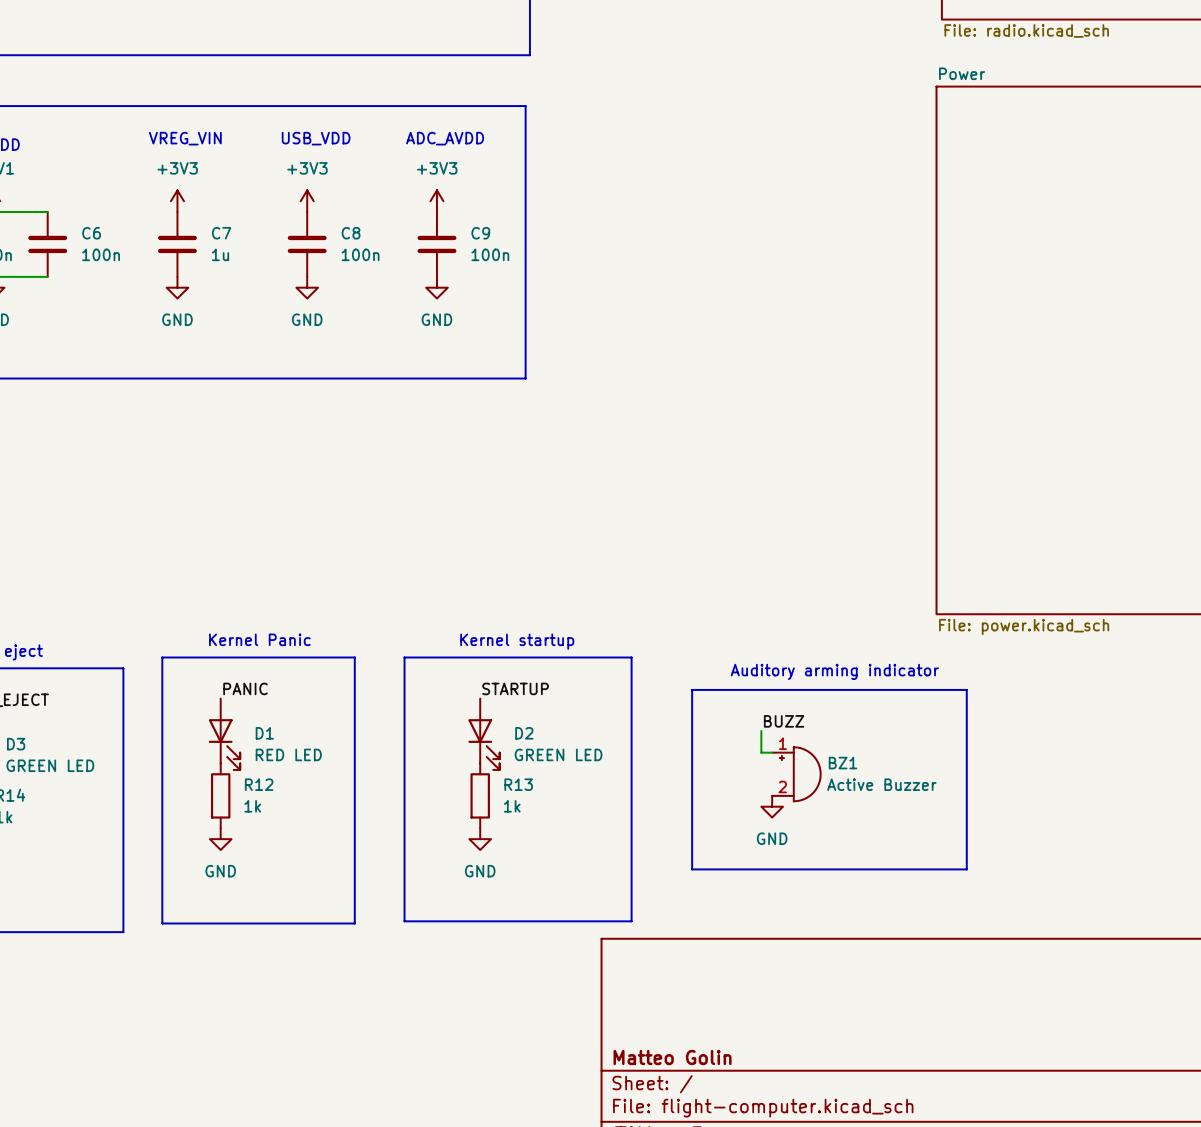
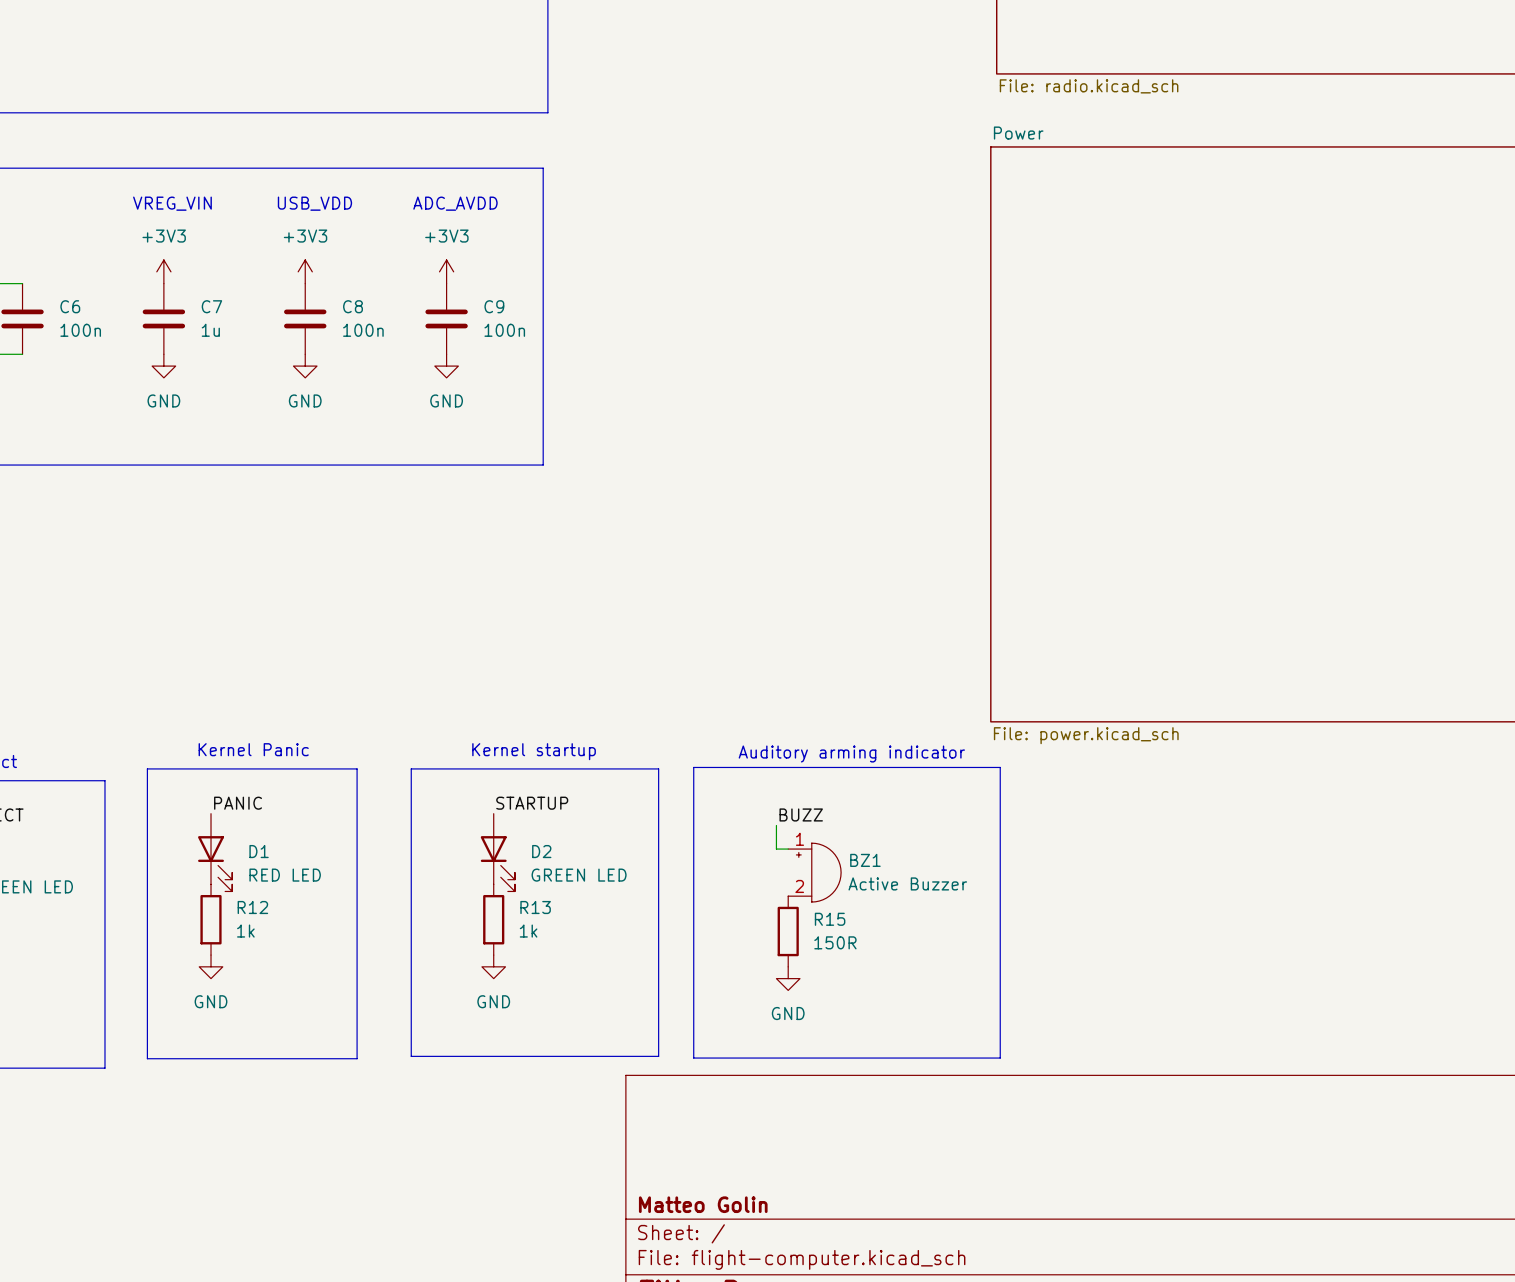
text position: Auditory arming indicator (834, 671) -> Auditory arming indicator (851, 754)
line: (692, 689) (966, 689) (966, 869) (692, 869) (692, 689) -> (693, 767) (693, 1058) (1000, 1058) (1000, 767) (693, 767)
label position: BUZZ (784, 721) -> BUZZ (801, 814)
wire: (761, 731) (761, 752) (772, 752) -> (776, 825) (776, 849) (788, 849)
BZ1 position: (796, 774) -> (814, 872)
R15: none -> 150R (788, 931)
power symbol position: GND (772, 806) -> GND (788, 978)

